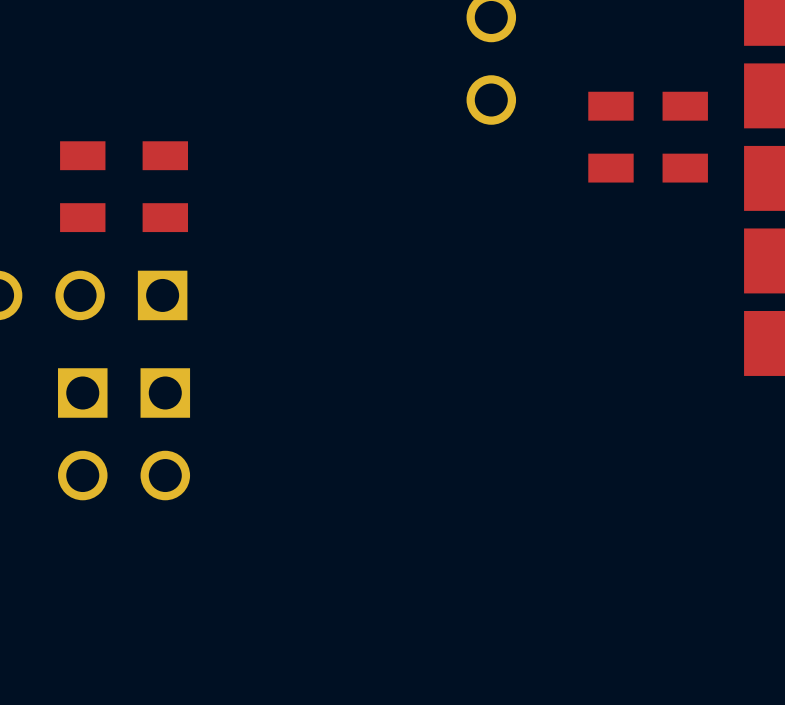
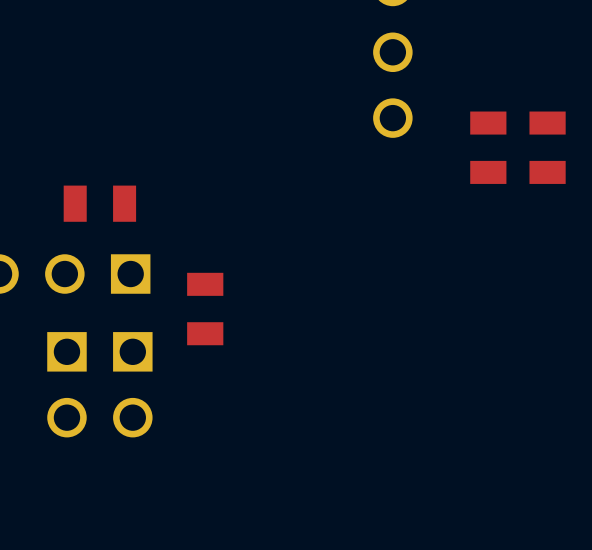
part: (82, 186) -> none
part: (165, 186) -> none
part: none -> (99, 203)
part: none -> (205, 309)

